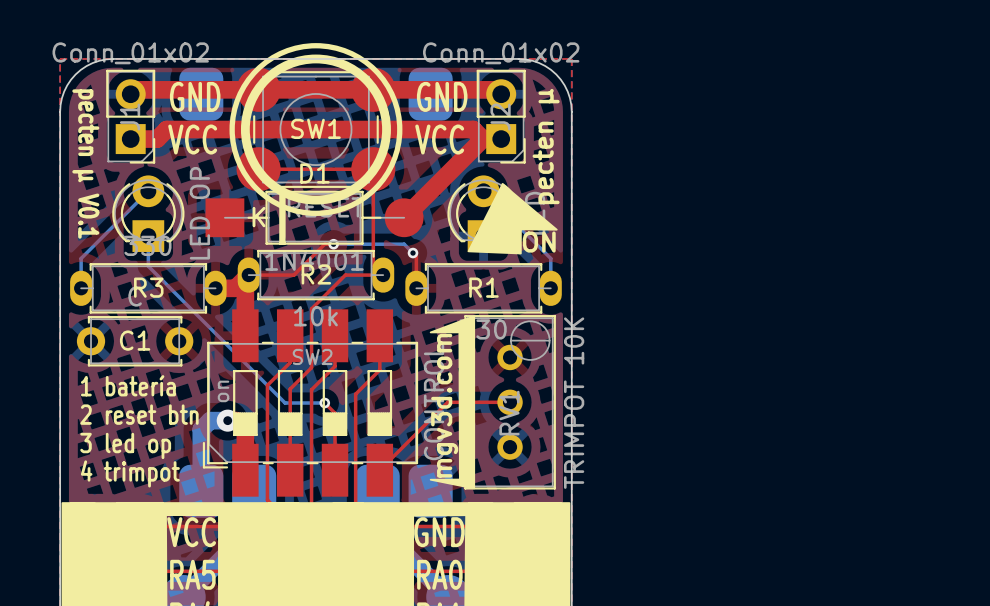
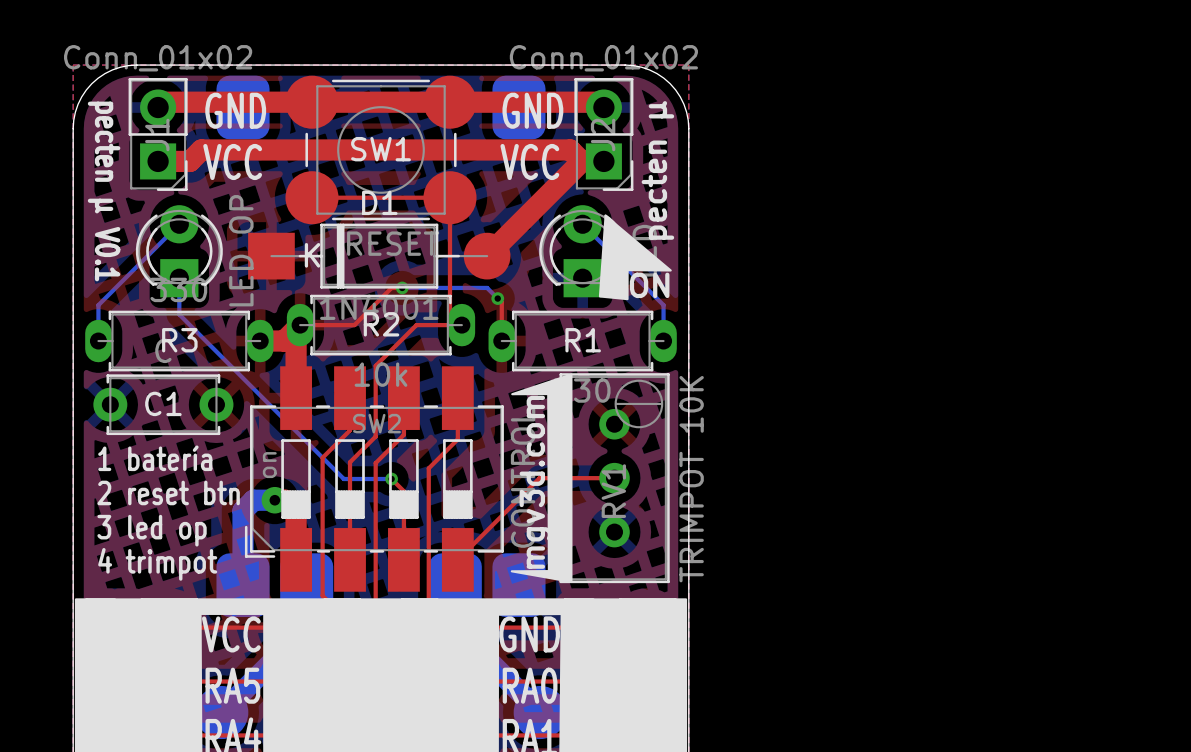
drawing: [229, 43, 403, 216] -> none
drawing shape: [467, 183, 558, 255] -> [598, 214, 672, 301]
drawing shape: [429, 315, 476, 490] -> [510, 373, 573, 583]

